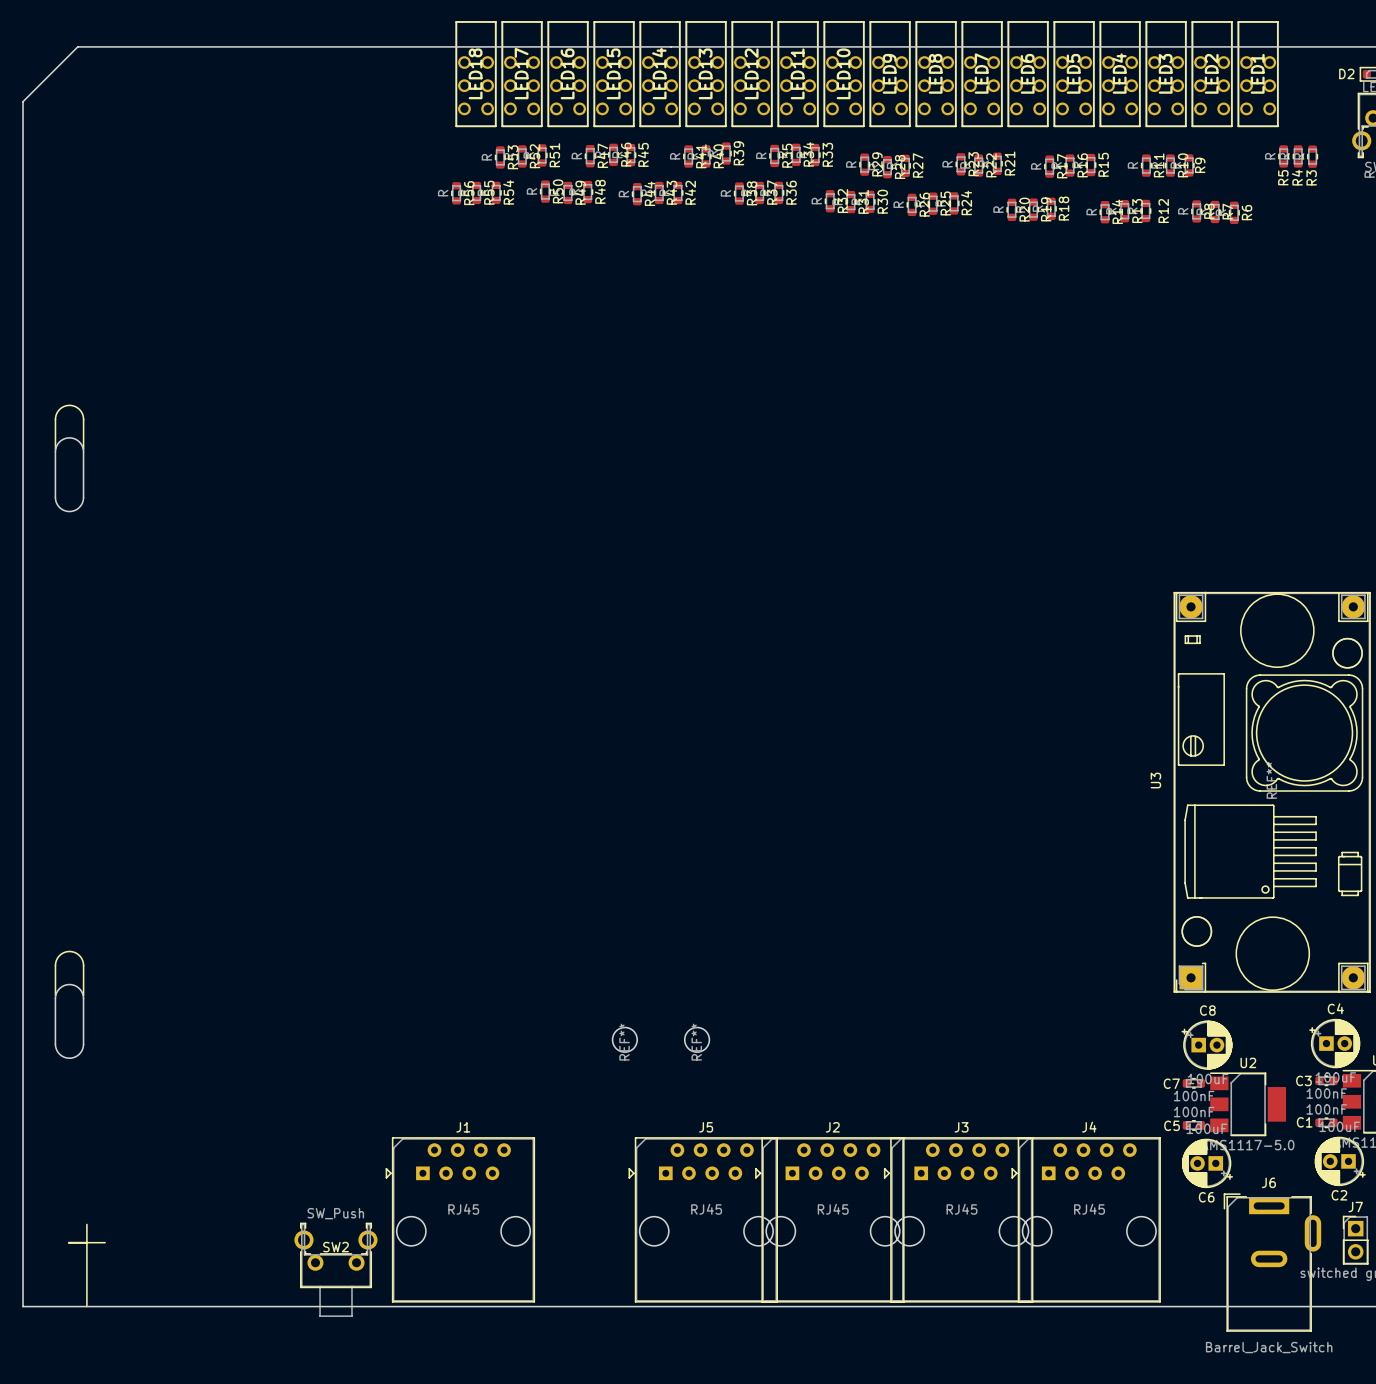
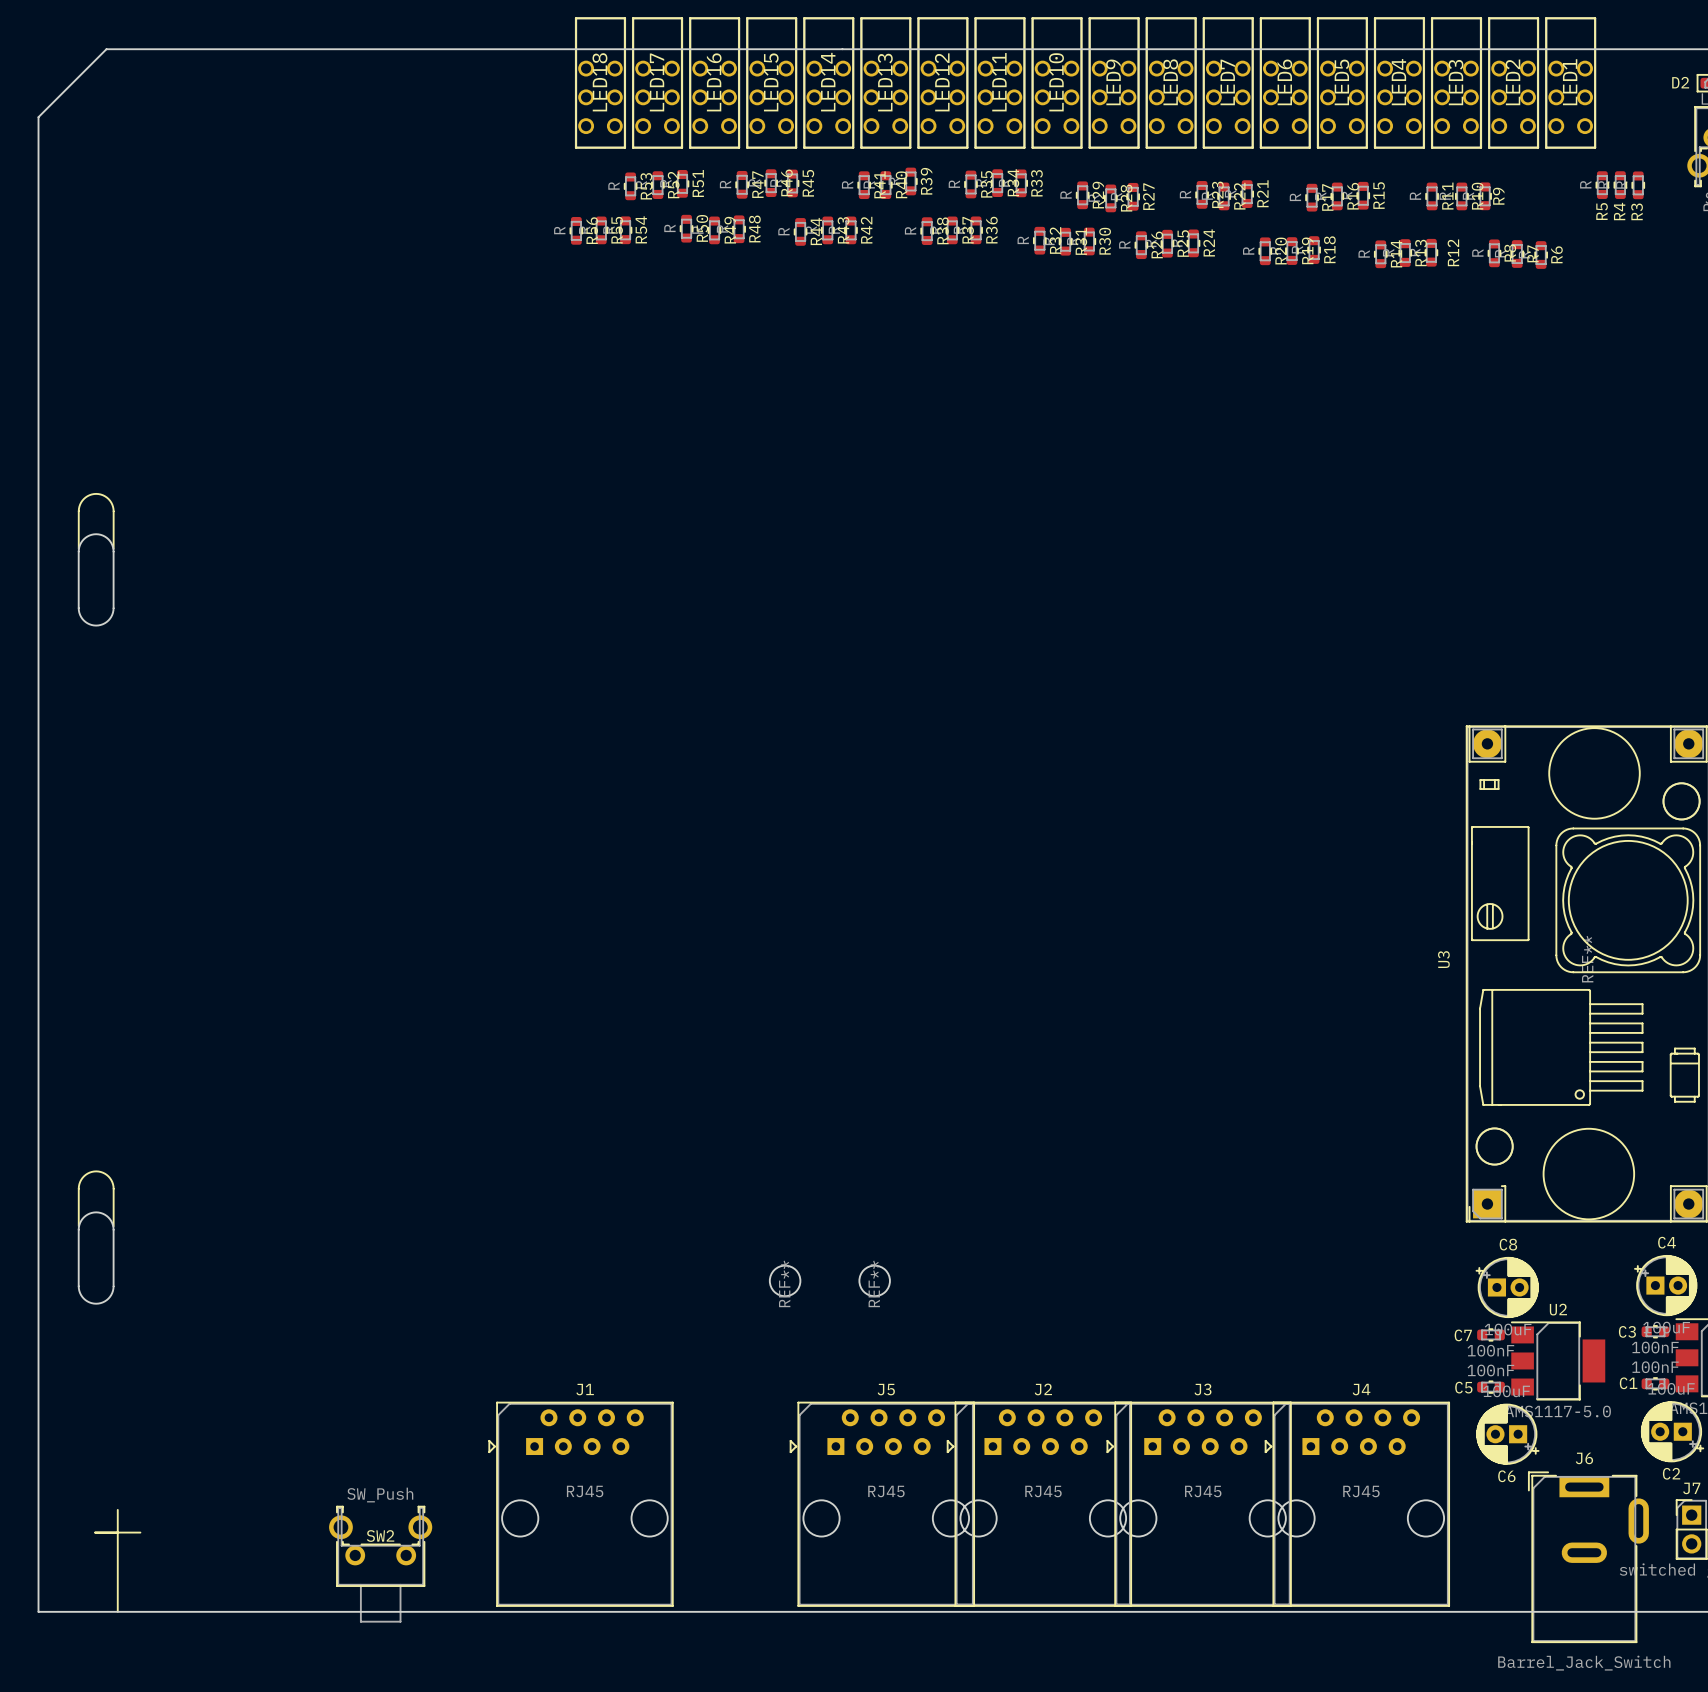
SW2 position: (335, 1269) -> (380, 1564)

